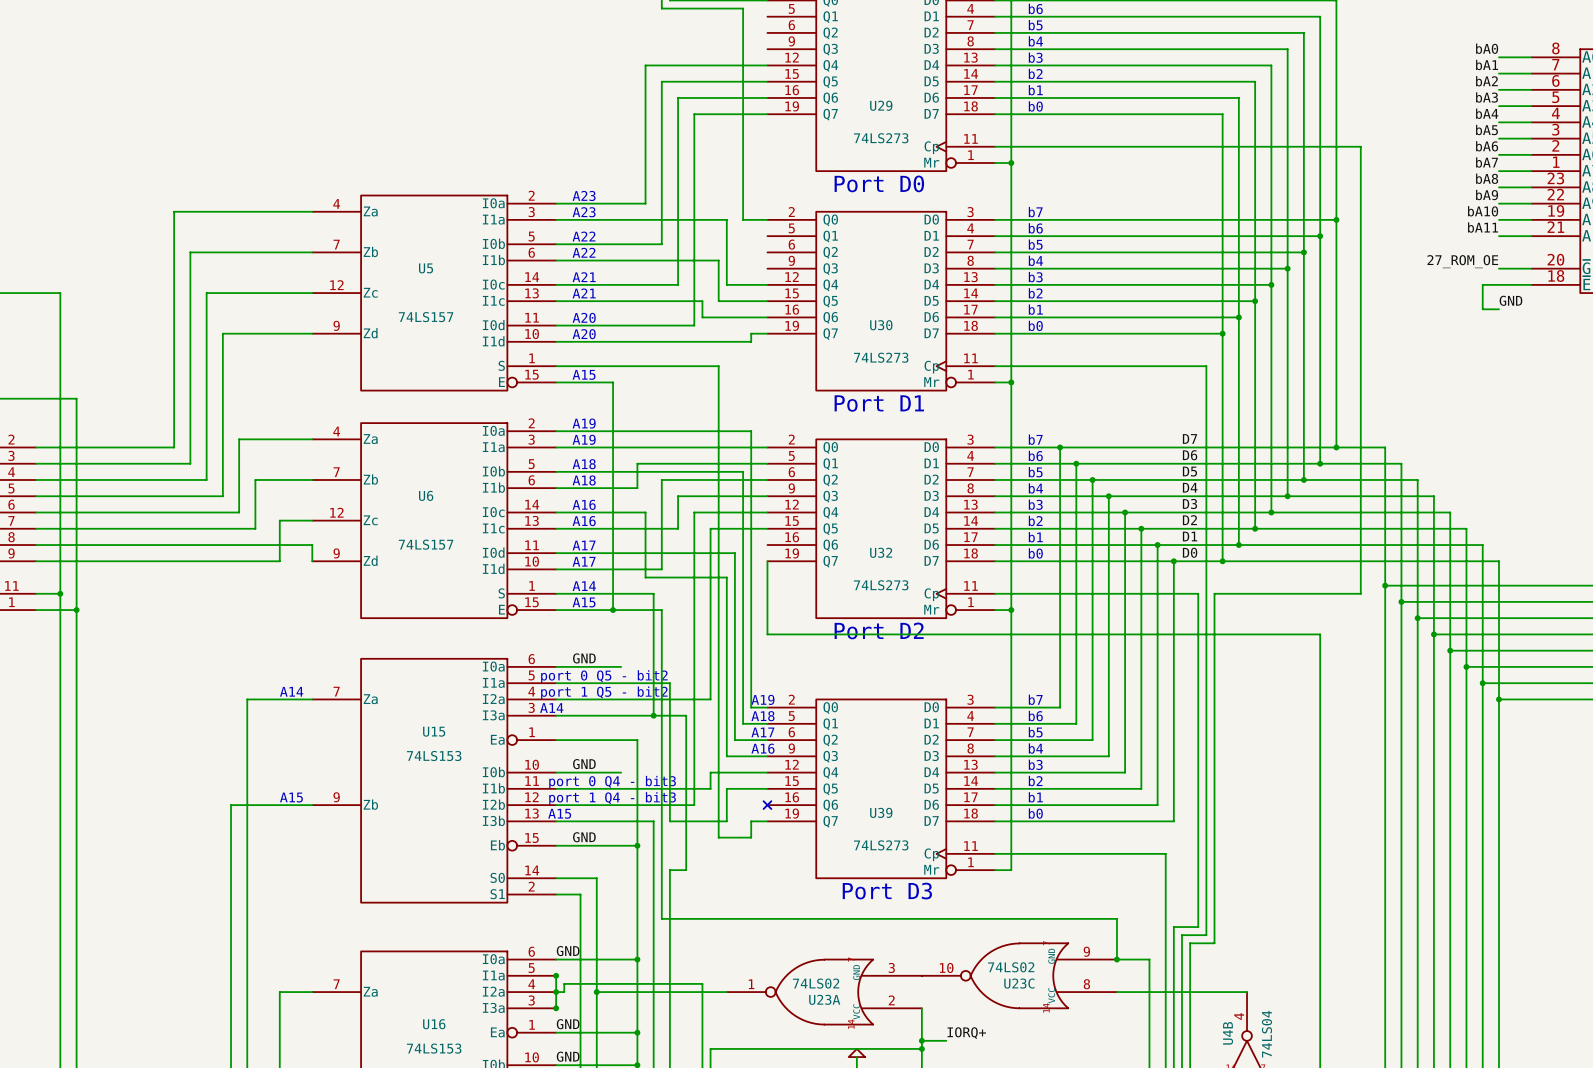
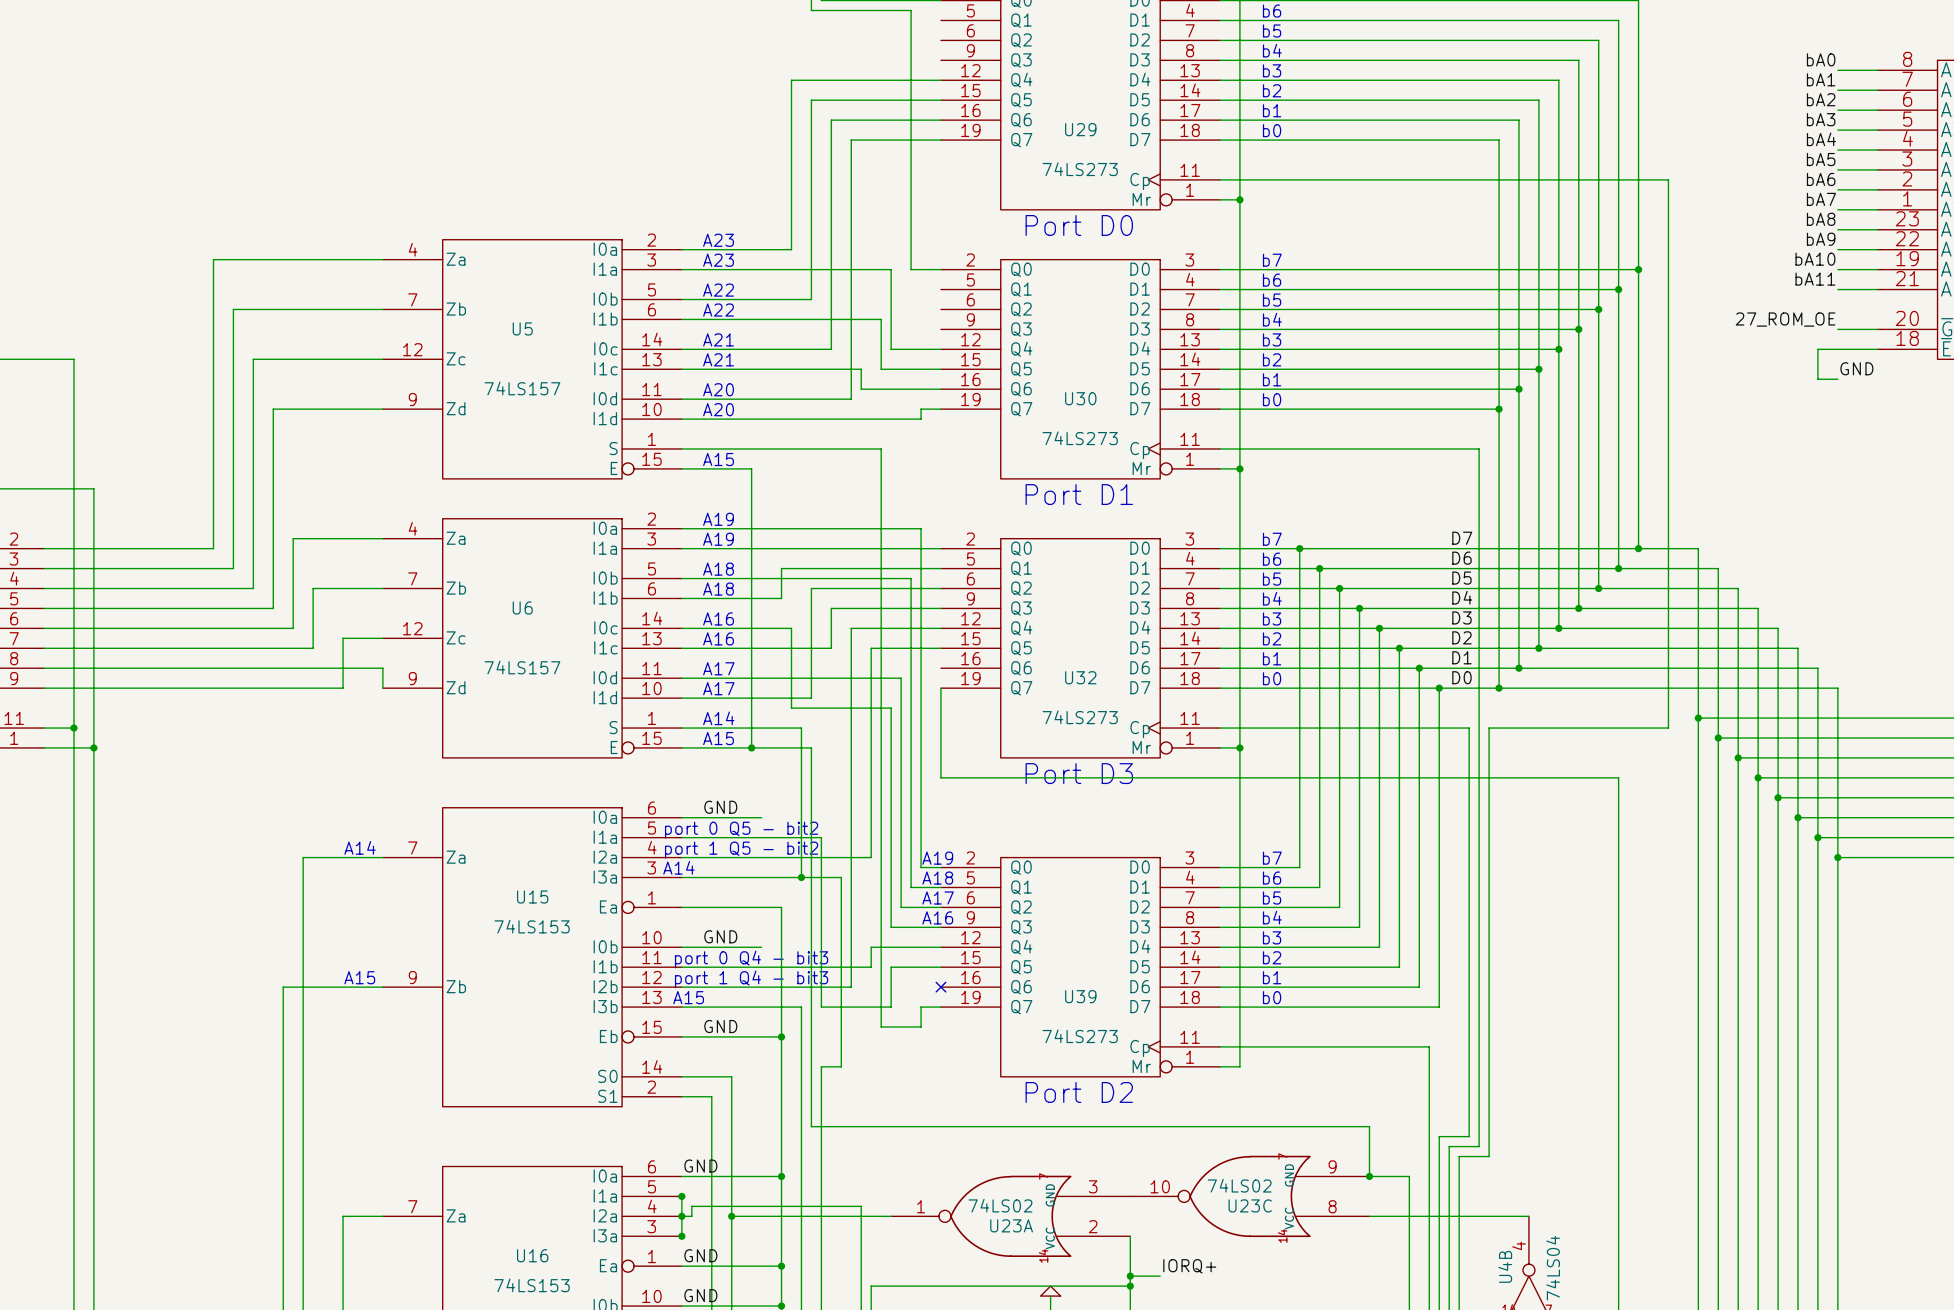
text: Port D2 (879, 630) -> Port D3 (1079, 773)
text: Port D3 (887, 891) -> Port D2 (1079, 1092)

